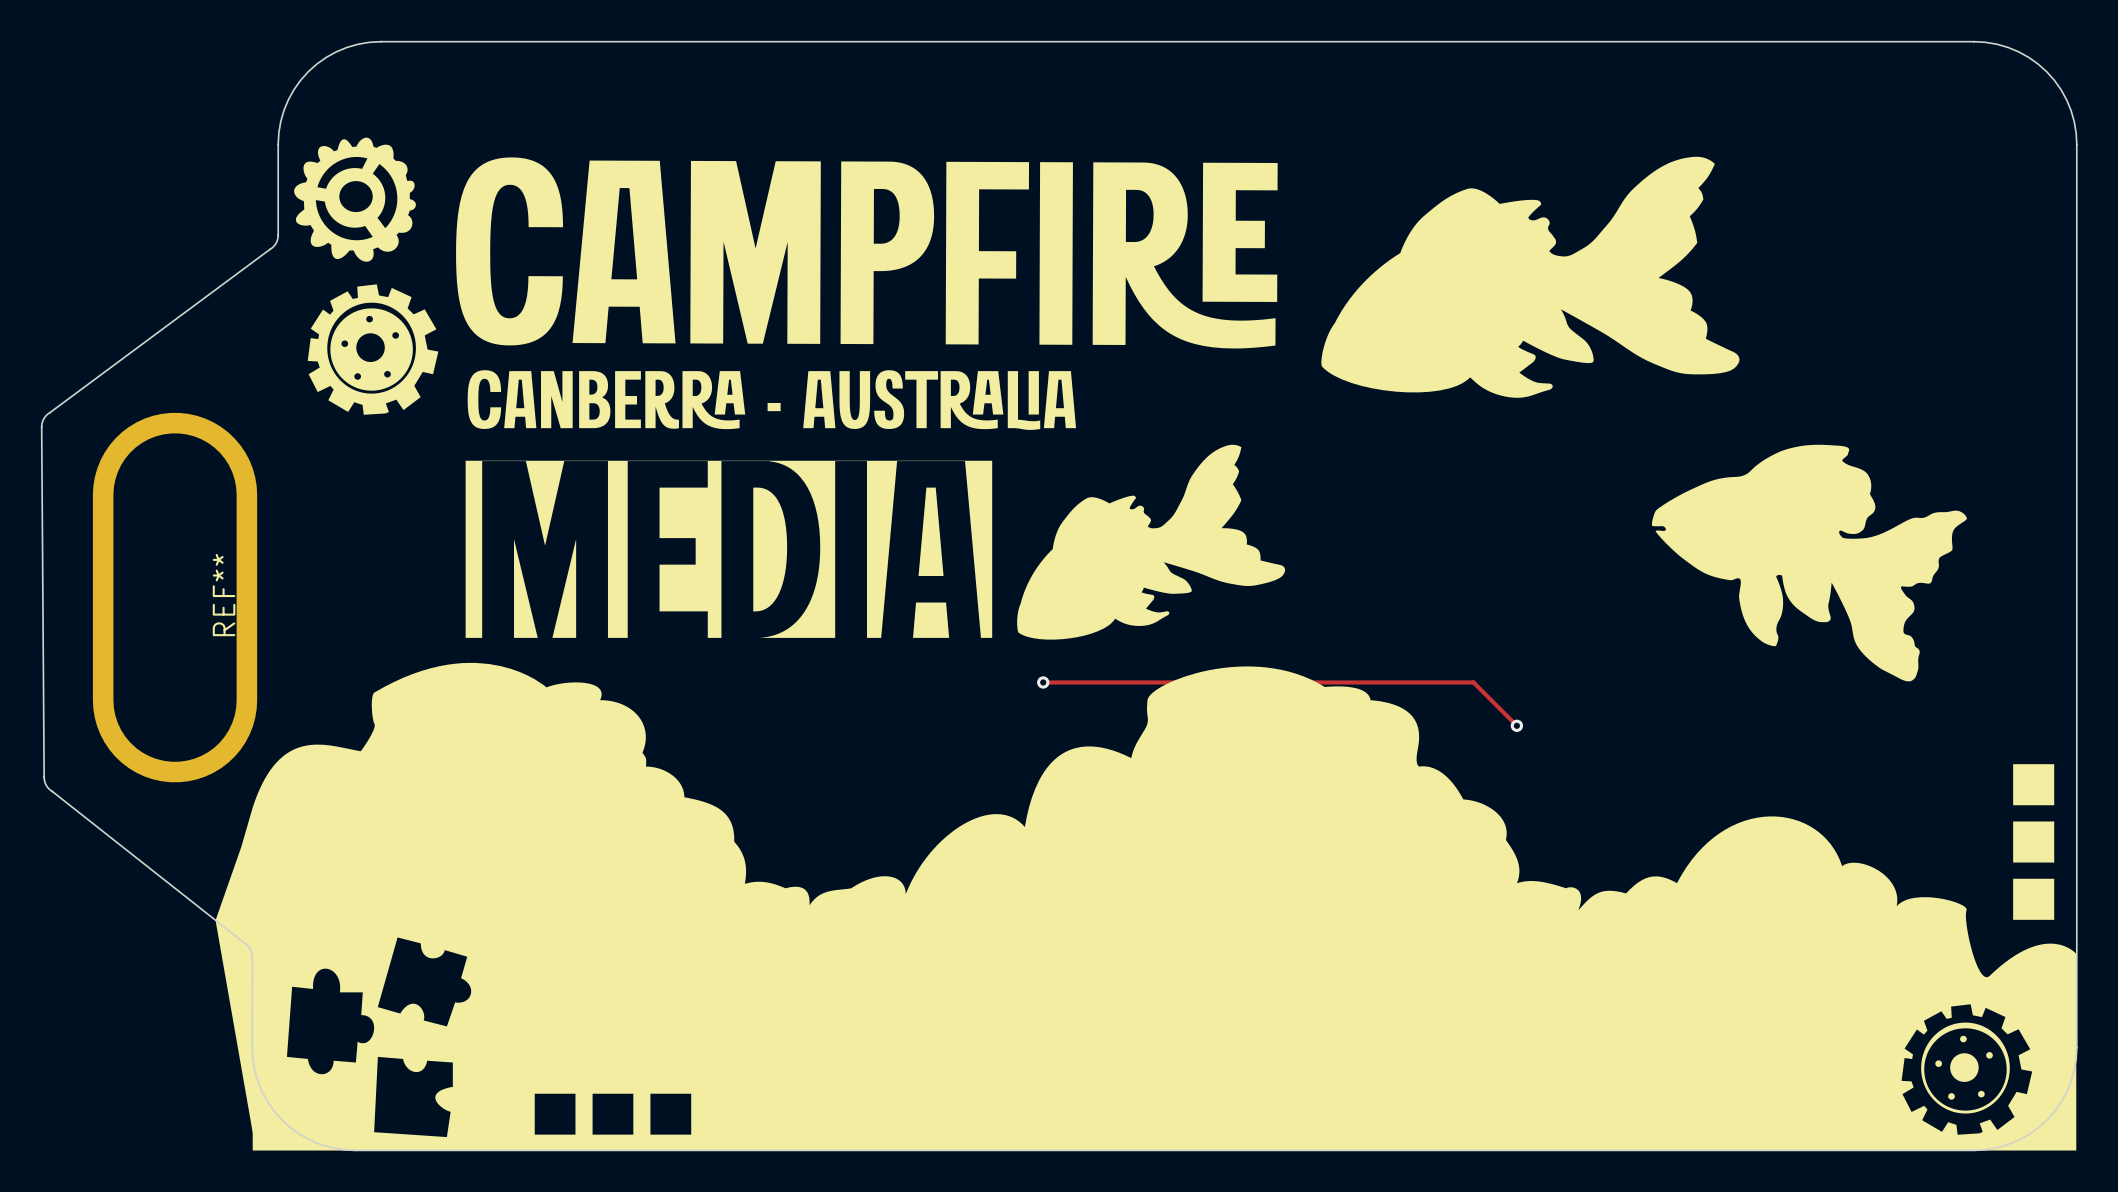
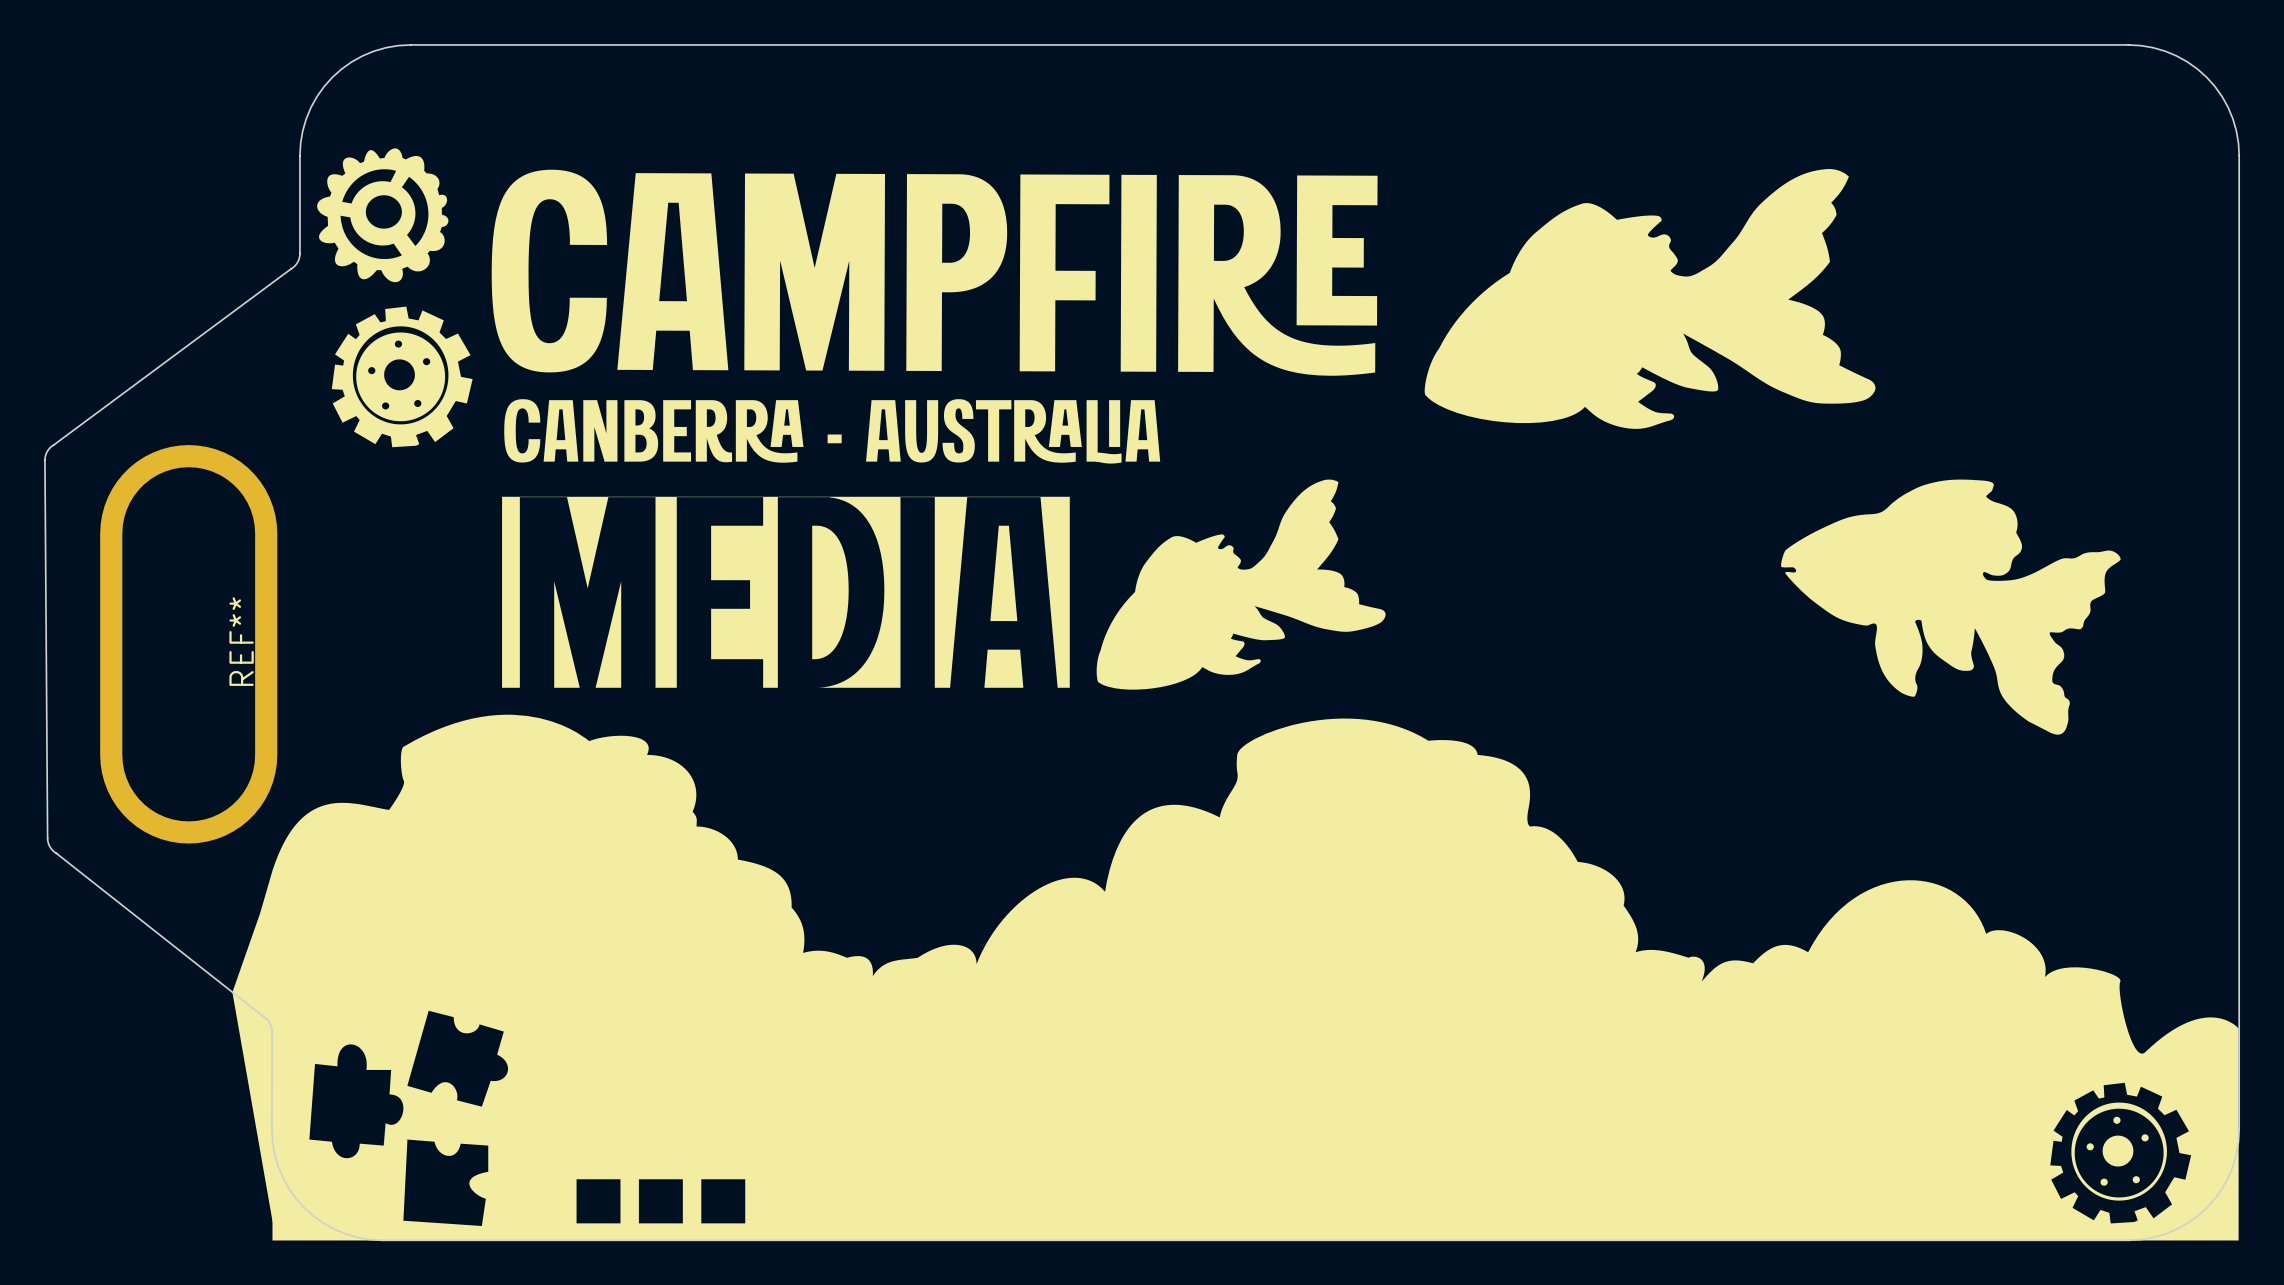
track: (1043, 682) (1473, 682) (1516, 725) -> none
via: (1043, 682) -> none
via: (1516, 725) -> none
drawing: [2013, 764, 2055, 920] -> none

